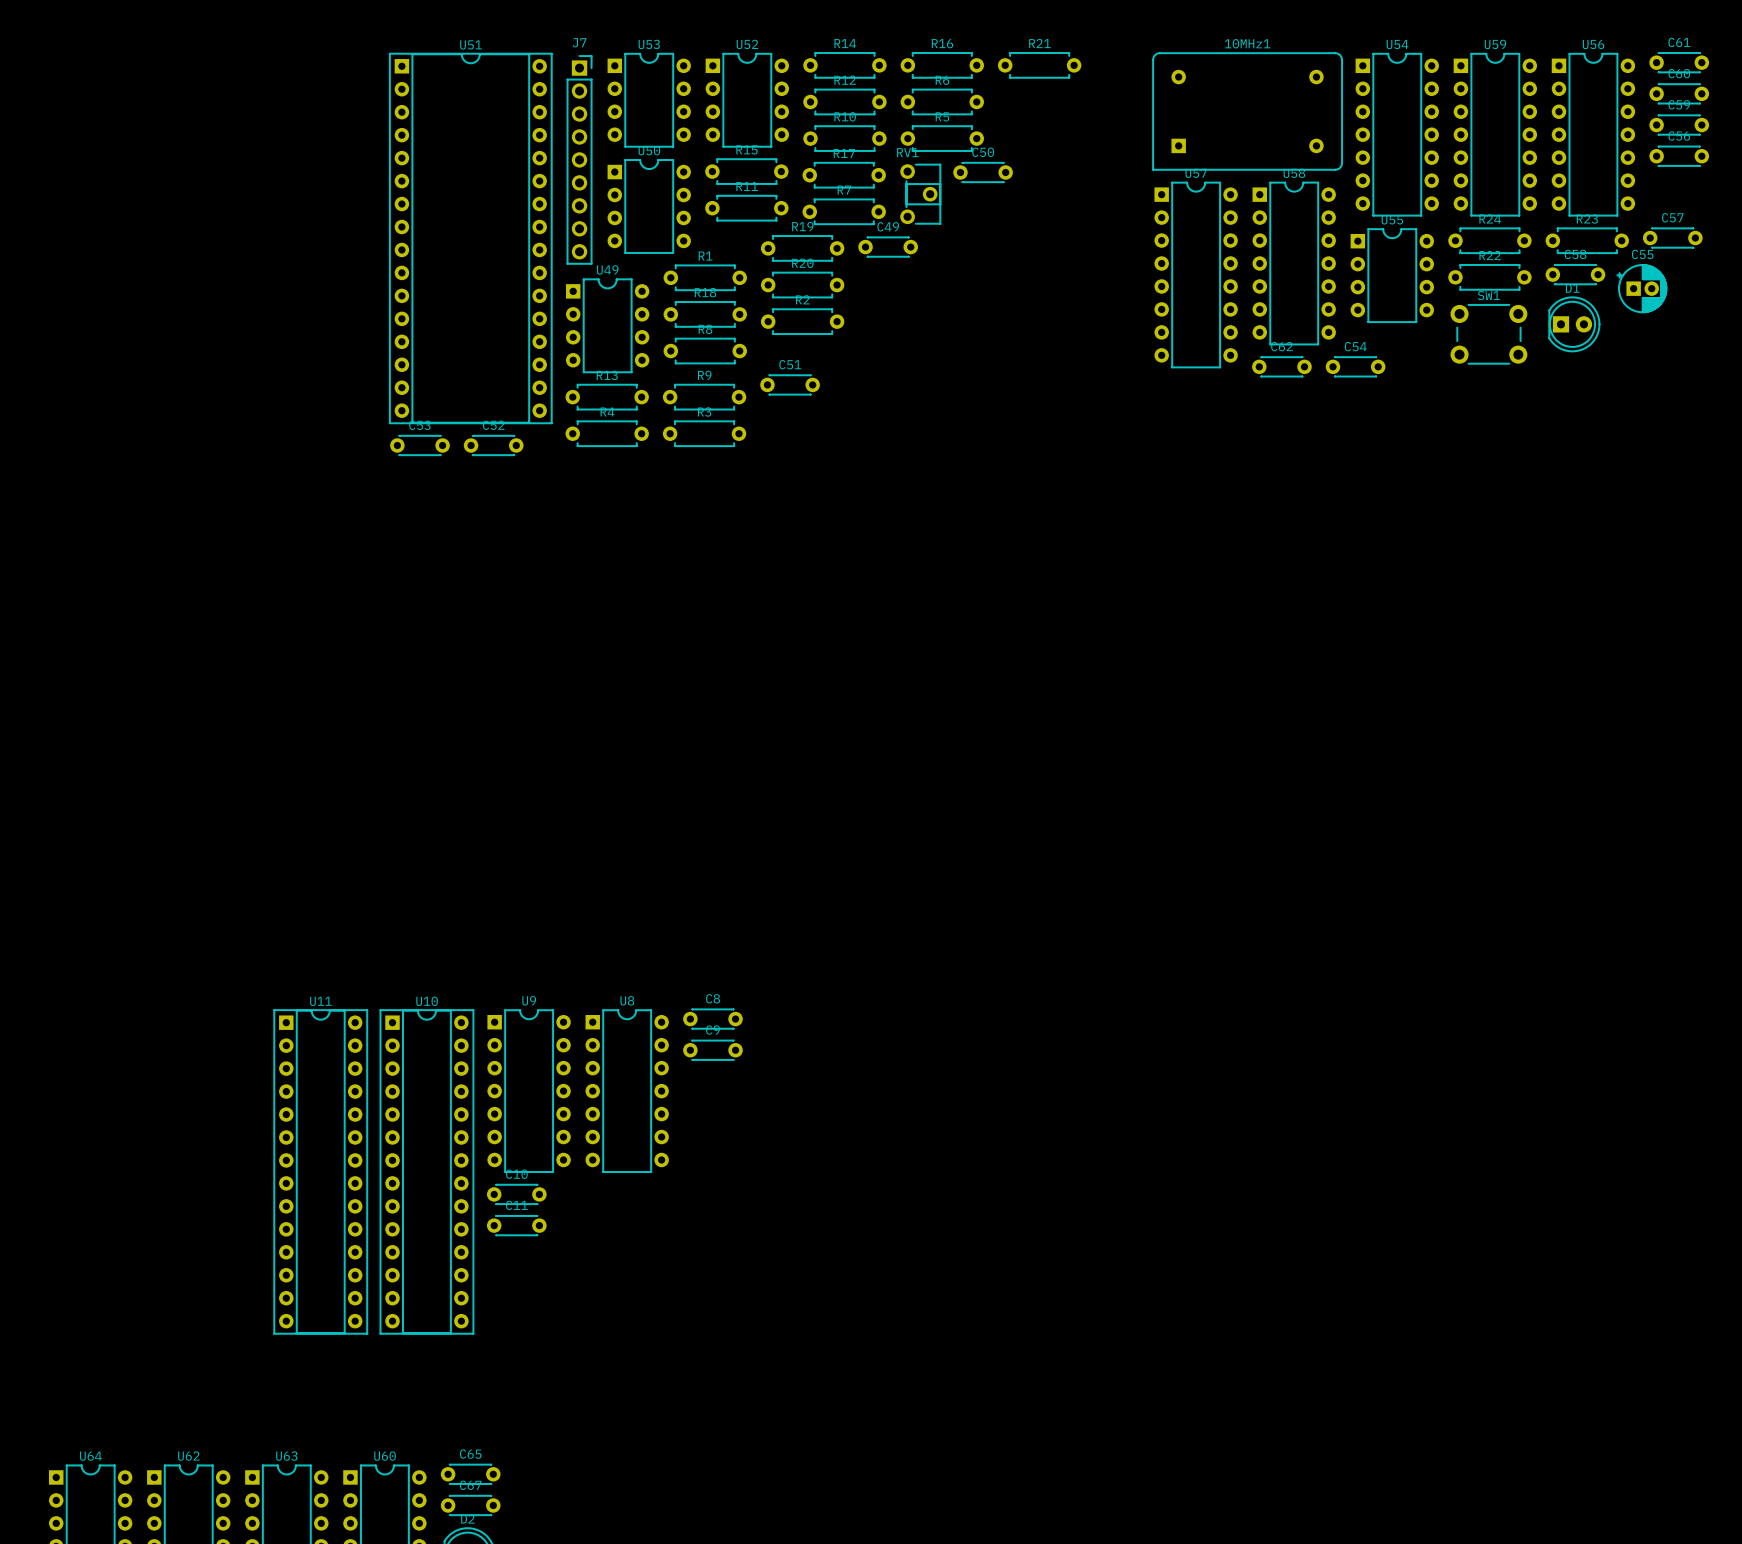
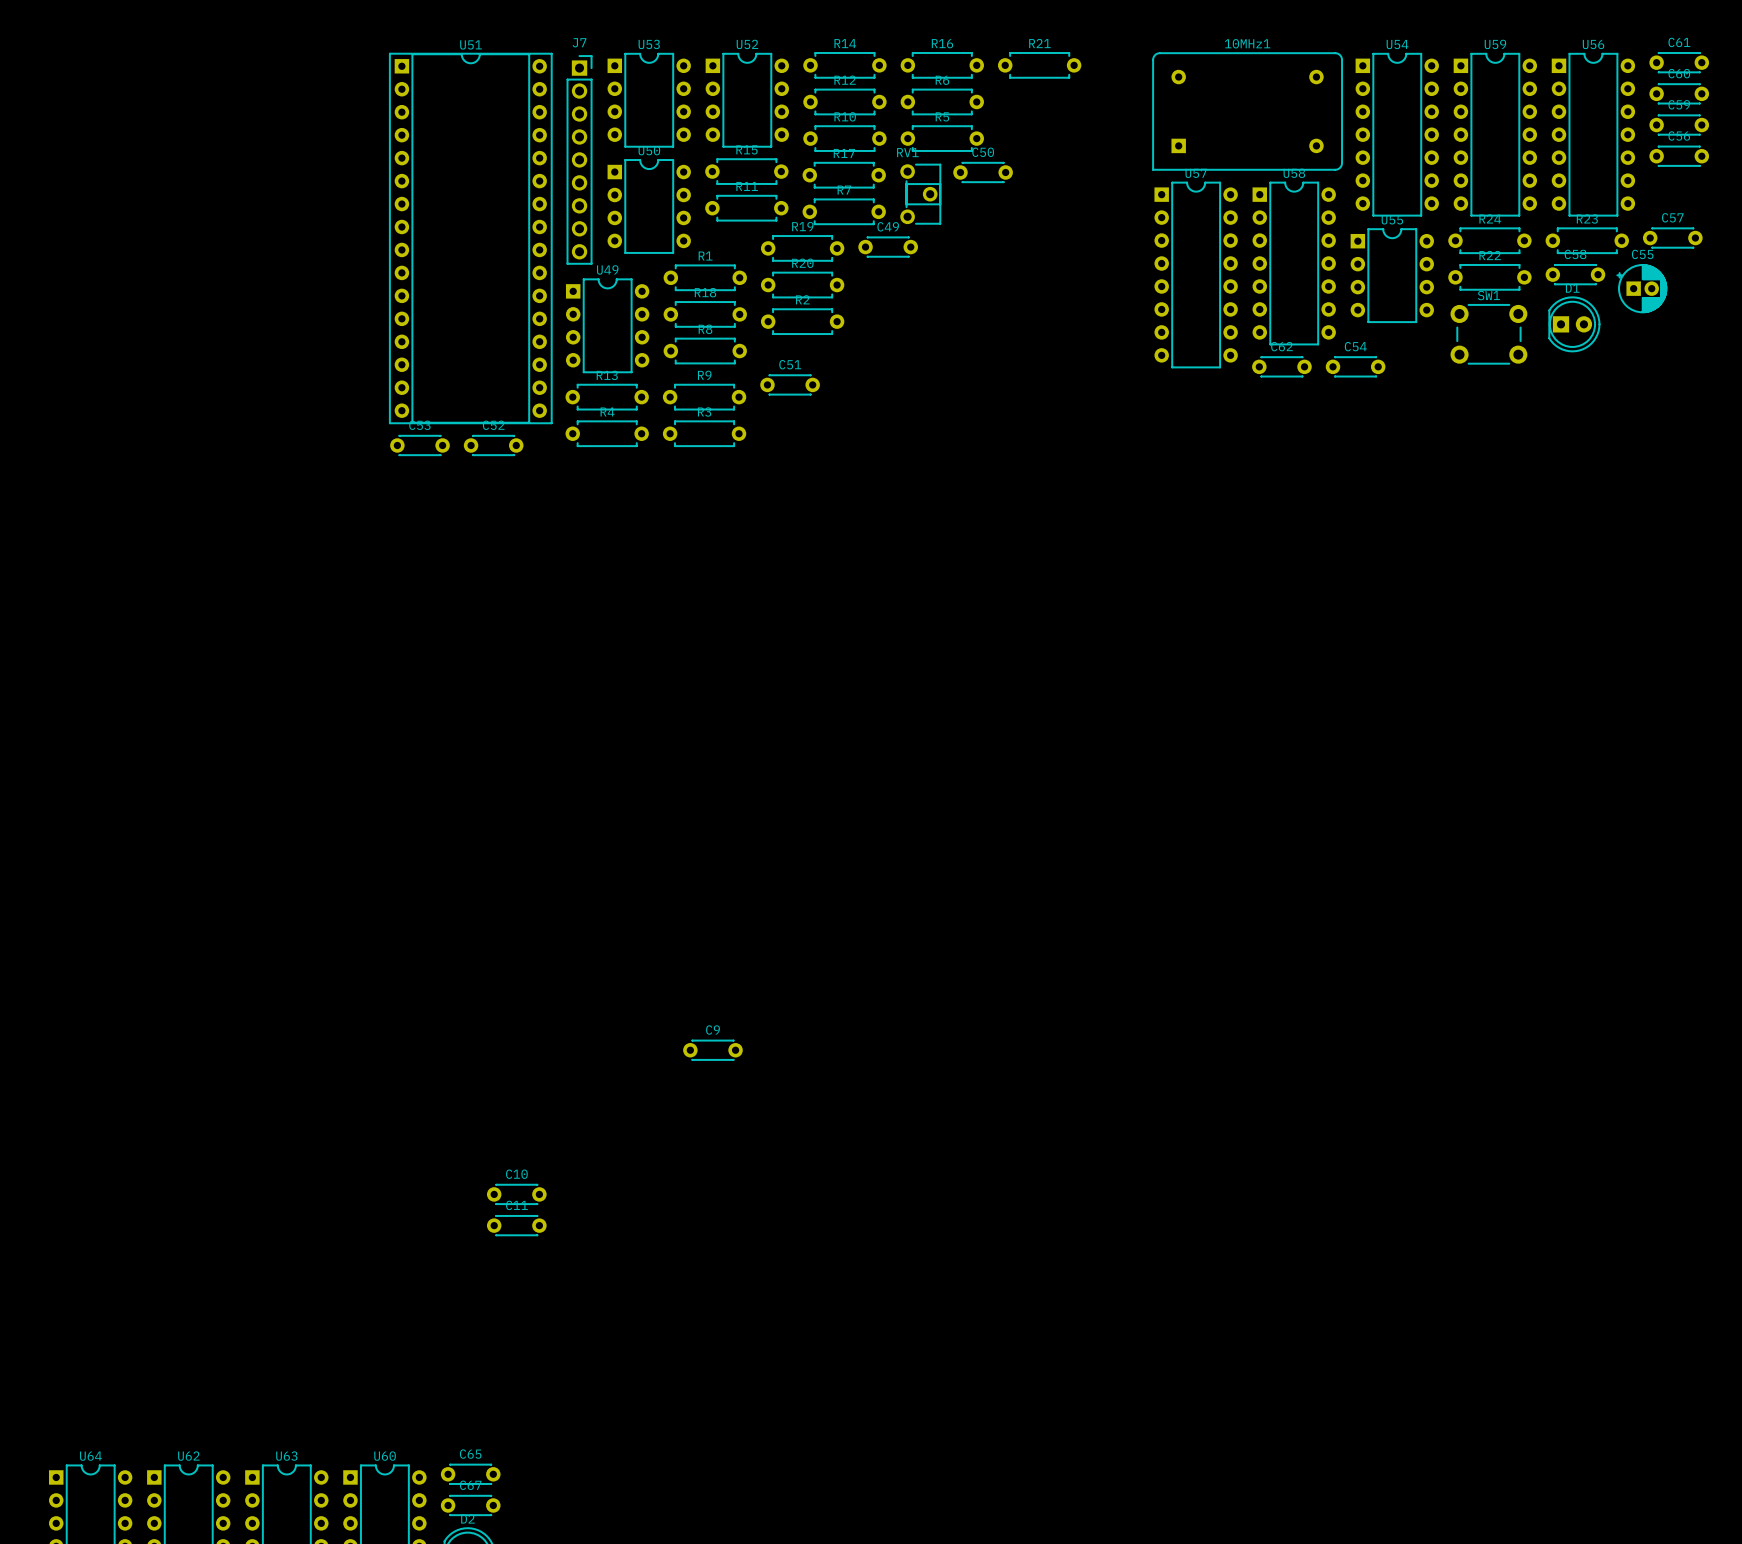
C8: (712, 1019) -> none
U9: (529, 1091) -> none
U8: (627, 1091) -> none
U11: (320, 1171) -> none
U10: (426, 1171) -> none

